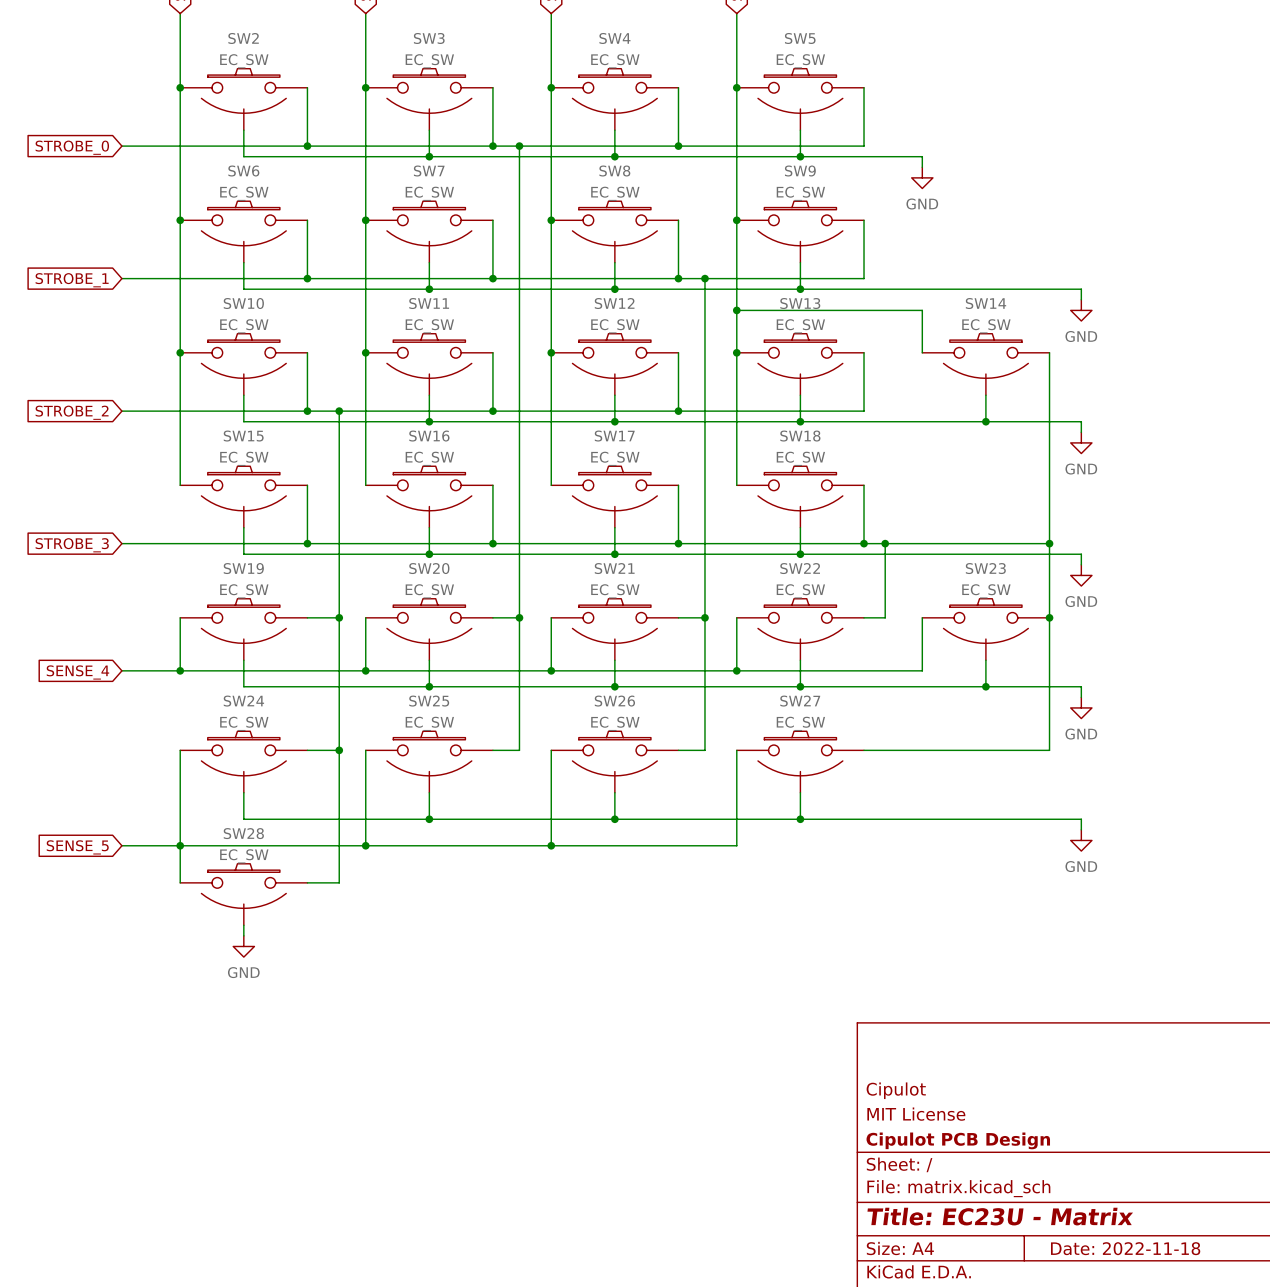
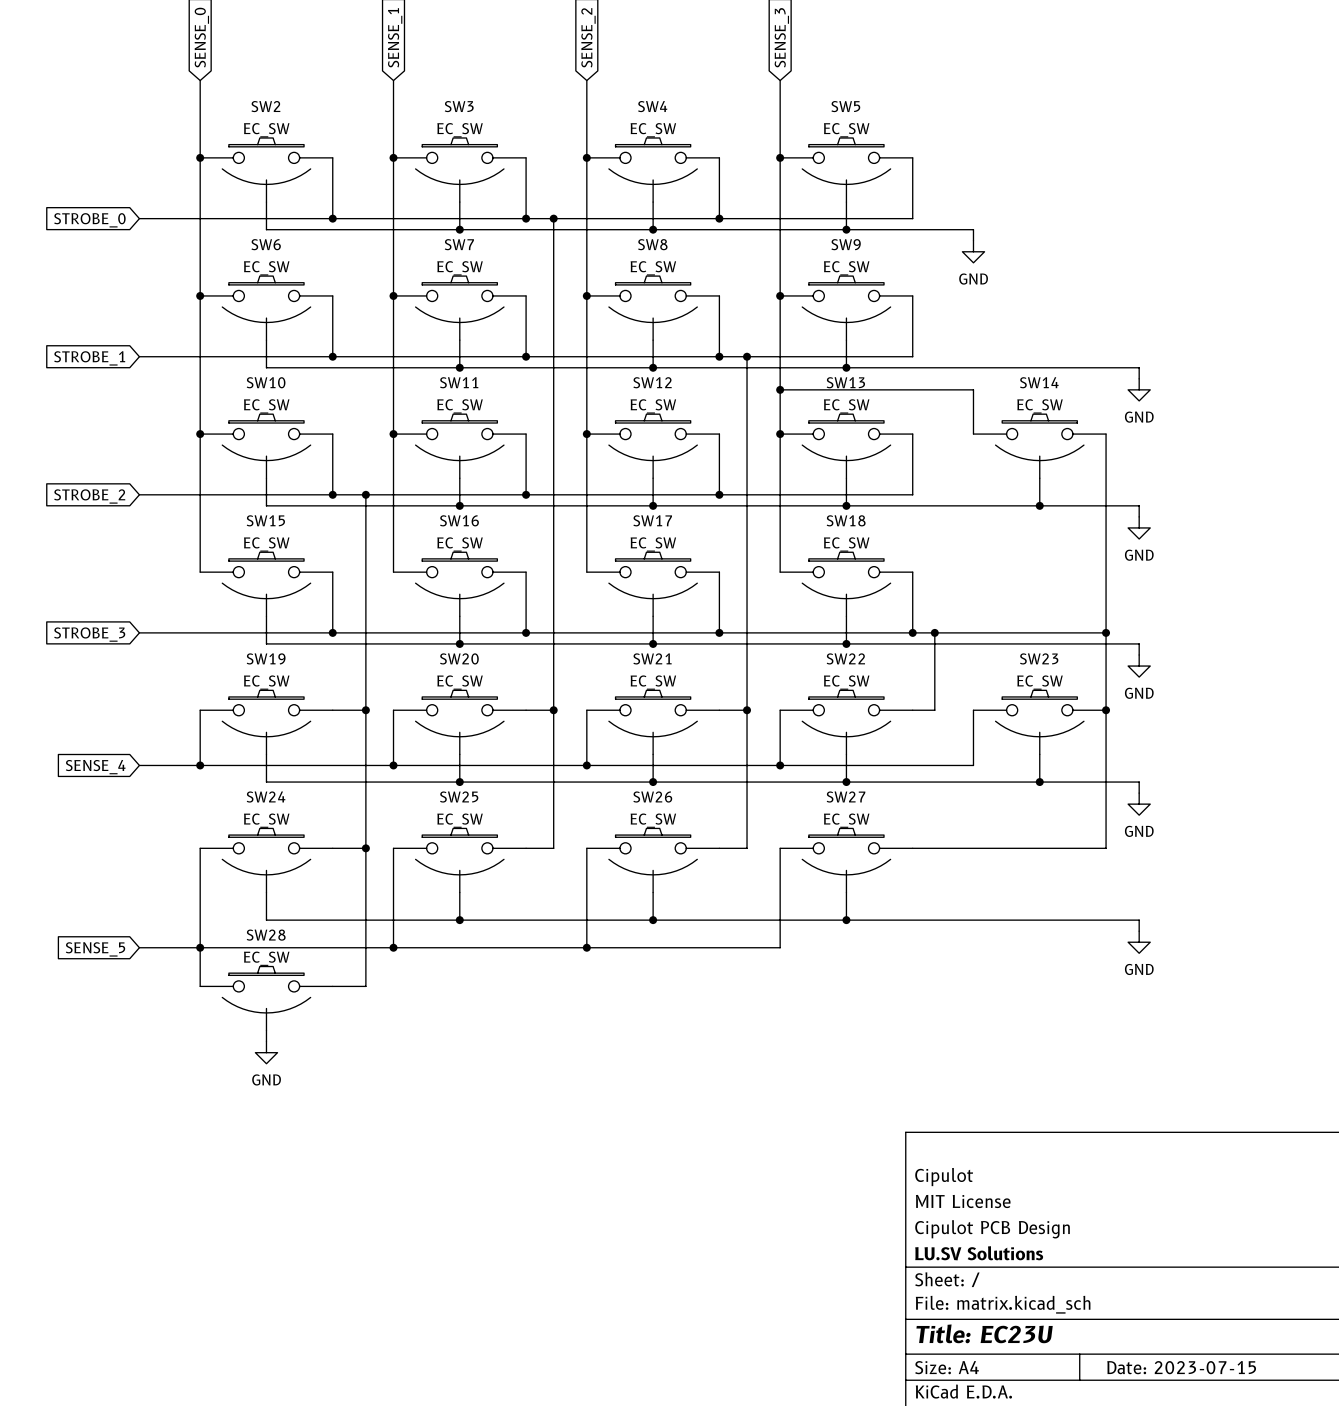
title block: none -> Cipulot (944, 1177)
title block: Cipulot (896, 1090) -> MIT License (963, 1201)
title block: MIT License (916, 1114) -> Cipulot PCB Design (992, 1229)
title block: Cipulot PCB Design (958, 1140) -> LU.SV Solutions (979, 1253)
title block: Title: EC23U - Matrix (1000, 1216) -> Title: EC23U (984, 1333)
title block: Date: 2022-11-18 (1125, 1248) -> Date: 2023-07-15 (1181, 1367)

